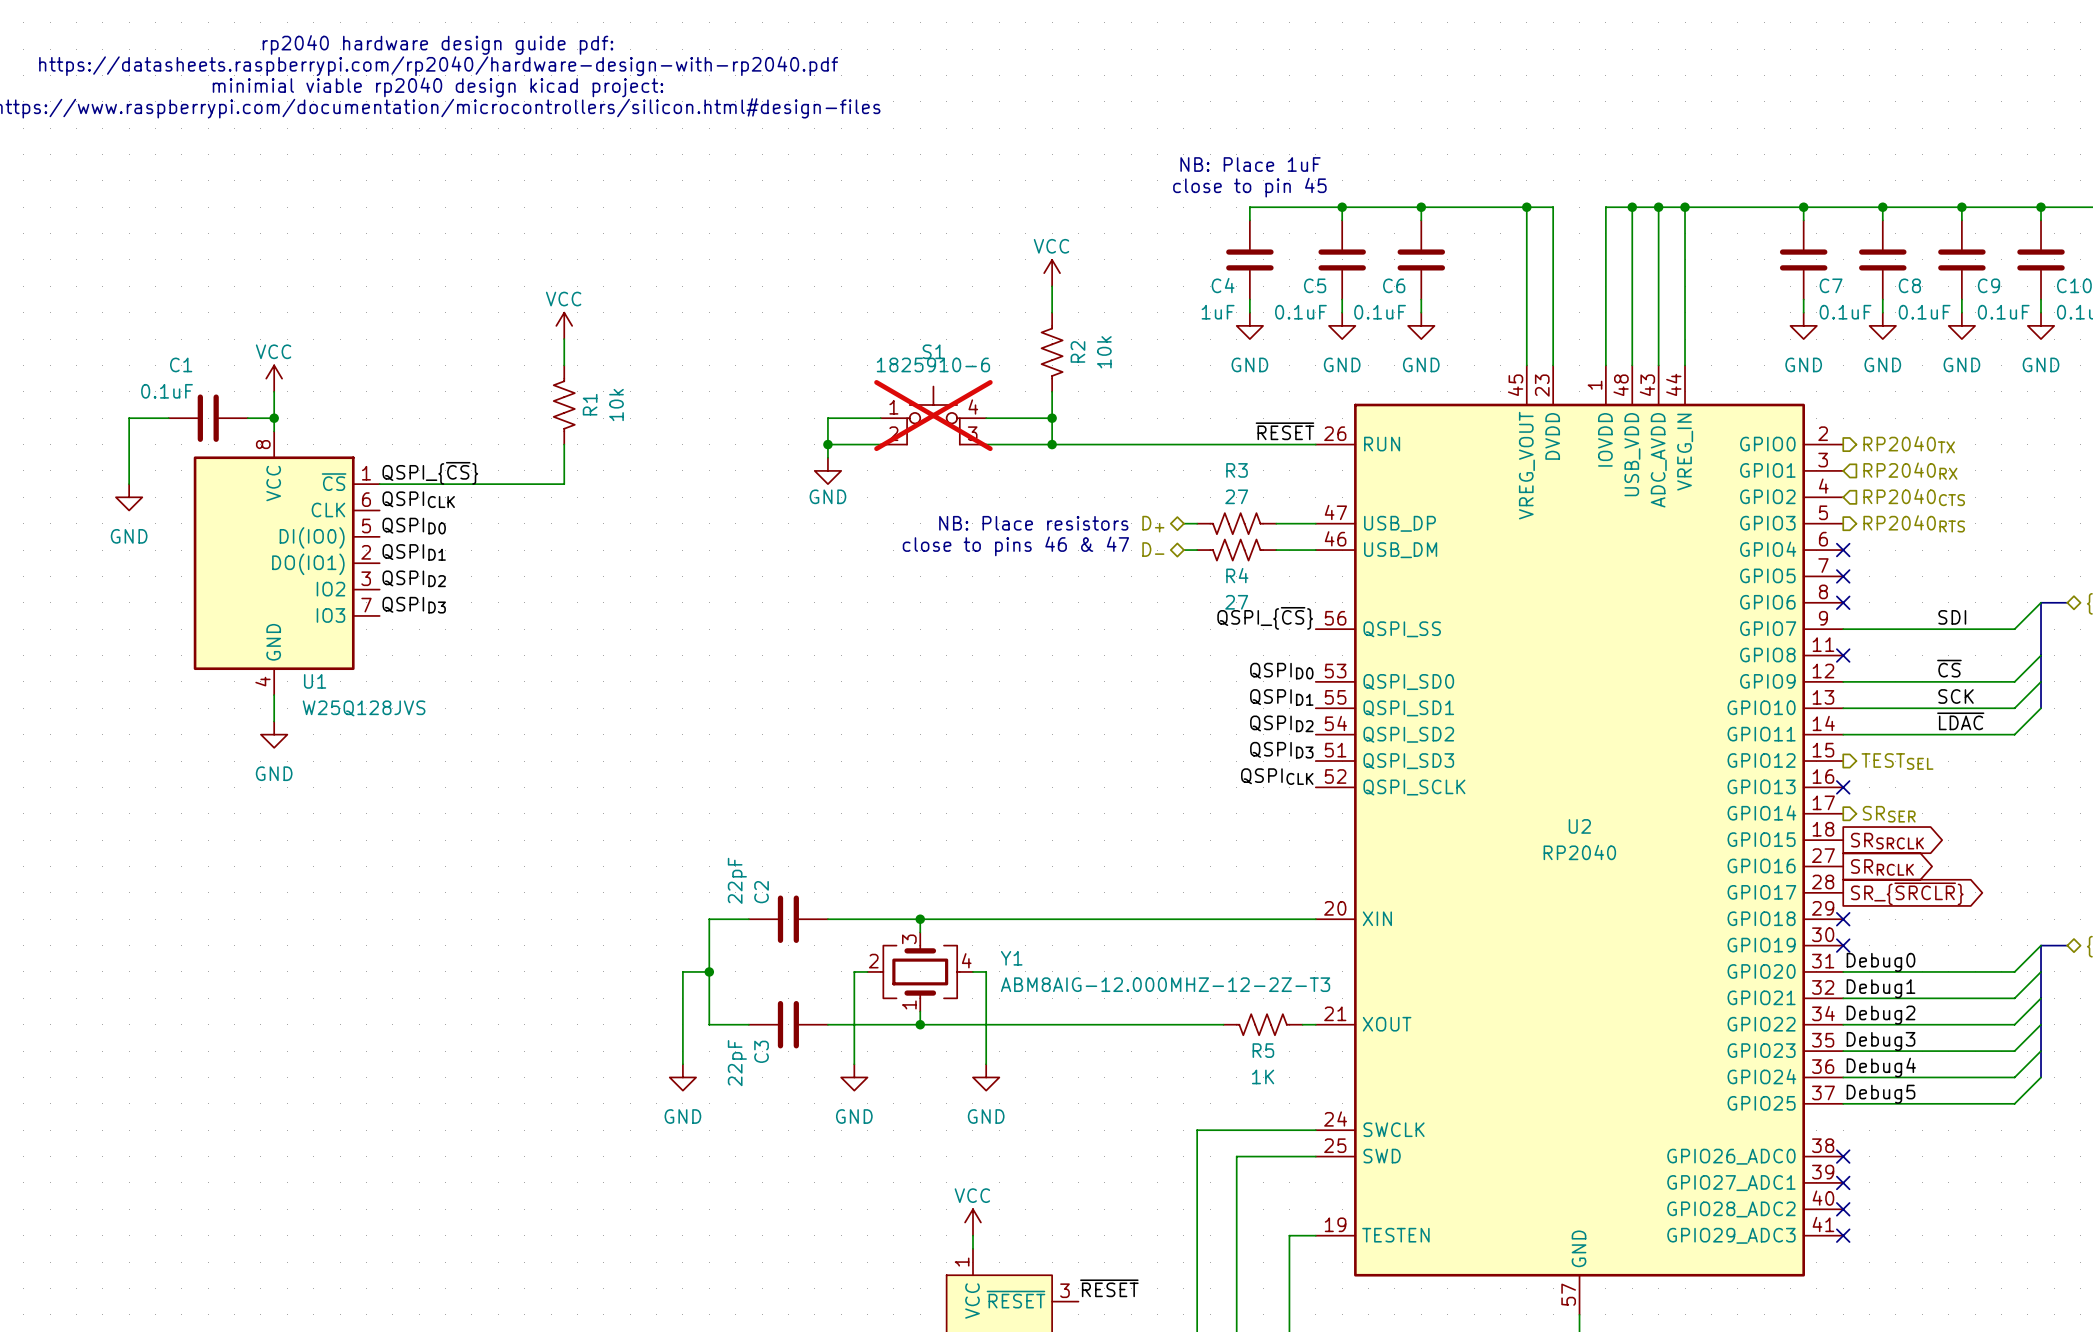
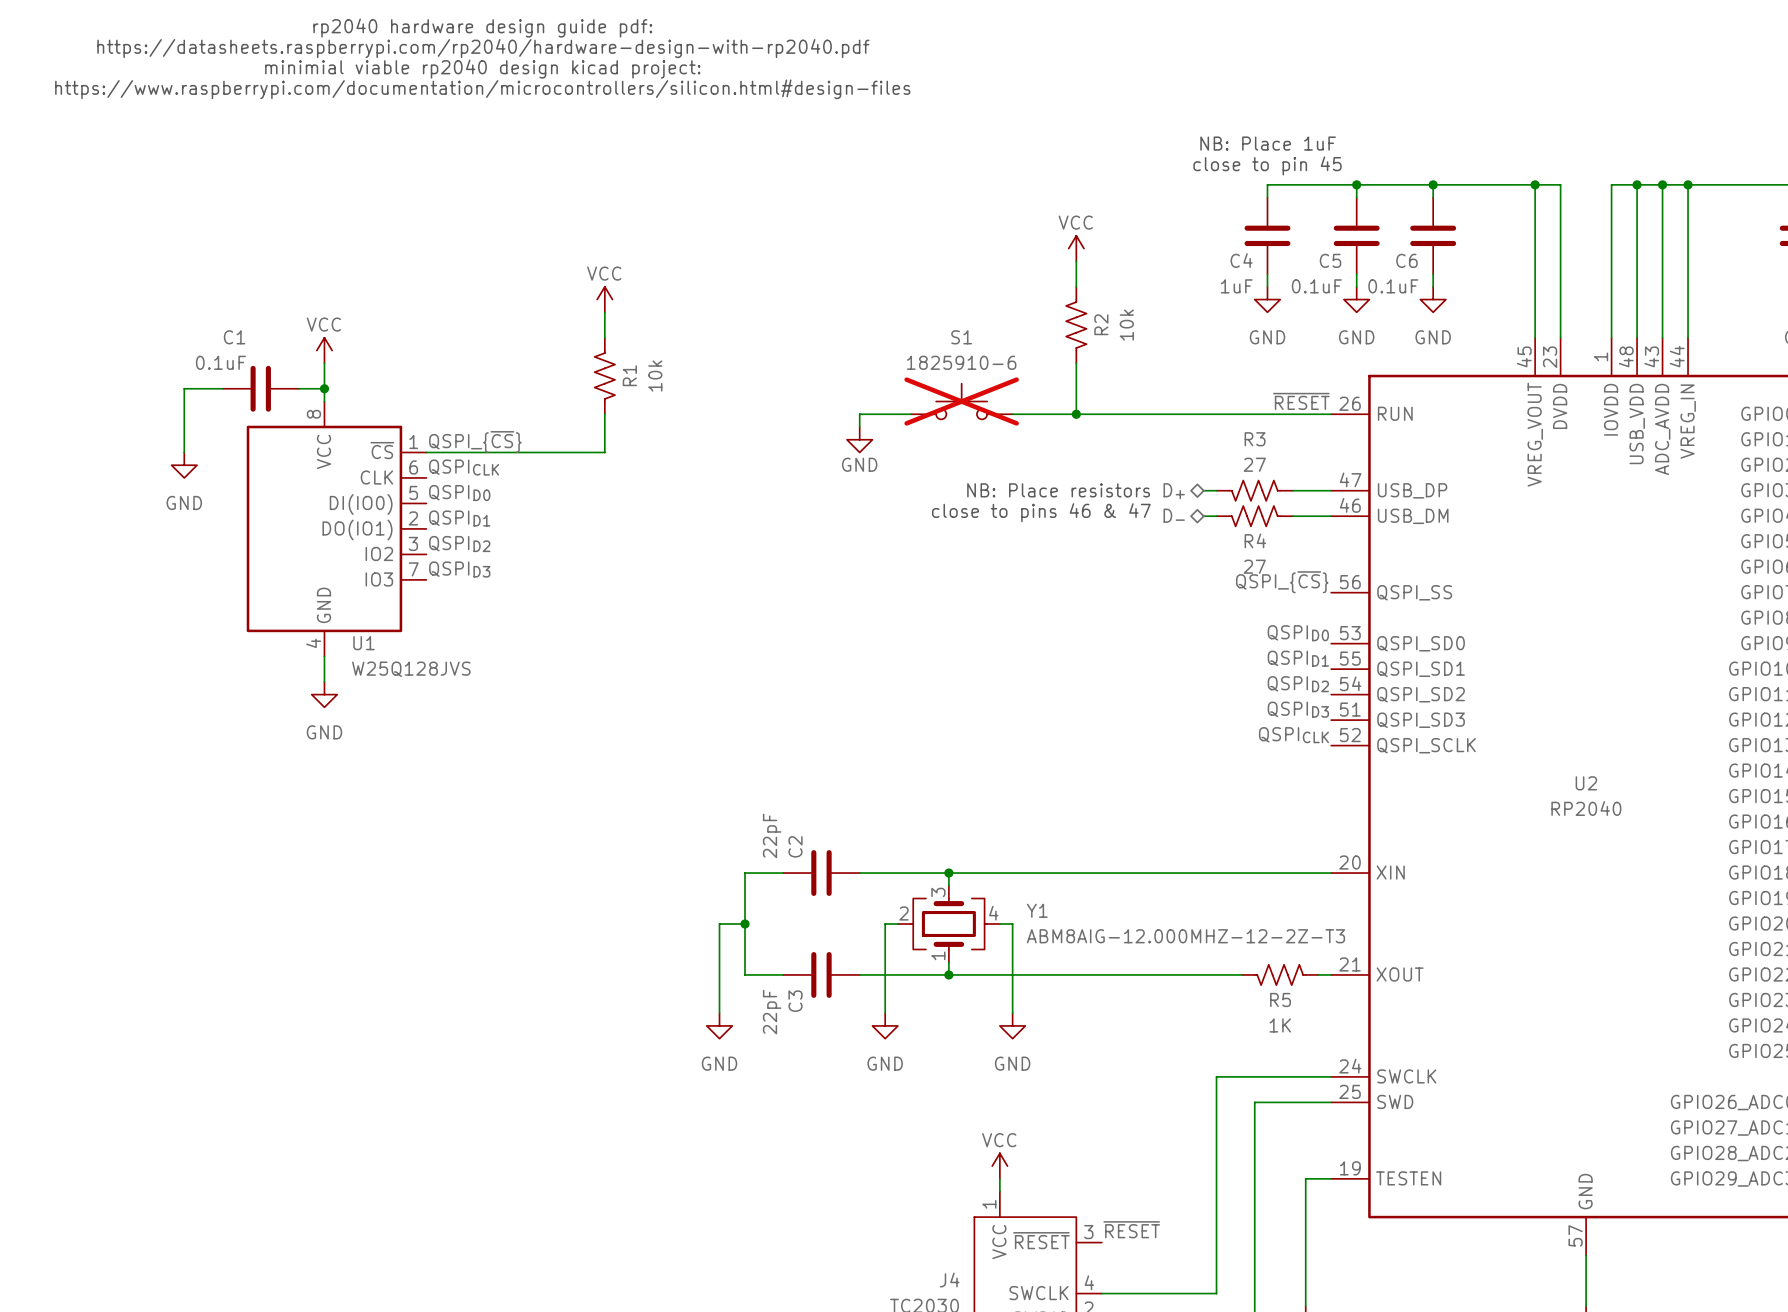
S1 symbol: [880, 386, 987, 445] -> [910, 383, 1013, 420]
wire: (880, 418) (827, 418) (827, 444) -> none
wire: (986, 418) (1052, 418) -> none
junction: (1052, 418) -> none
junction: (827, 444) -> none

